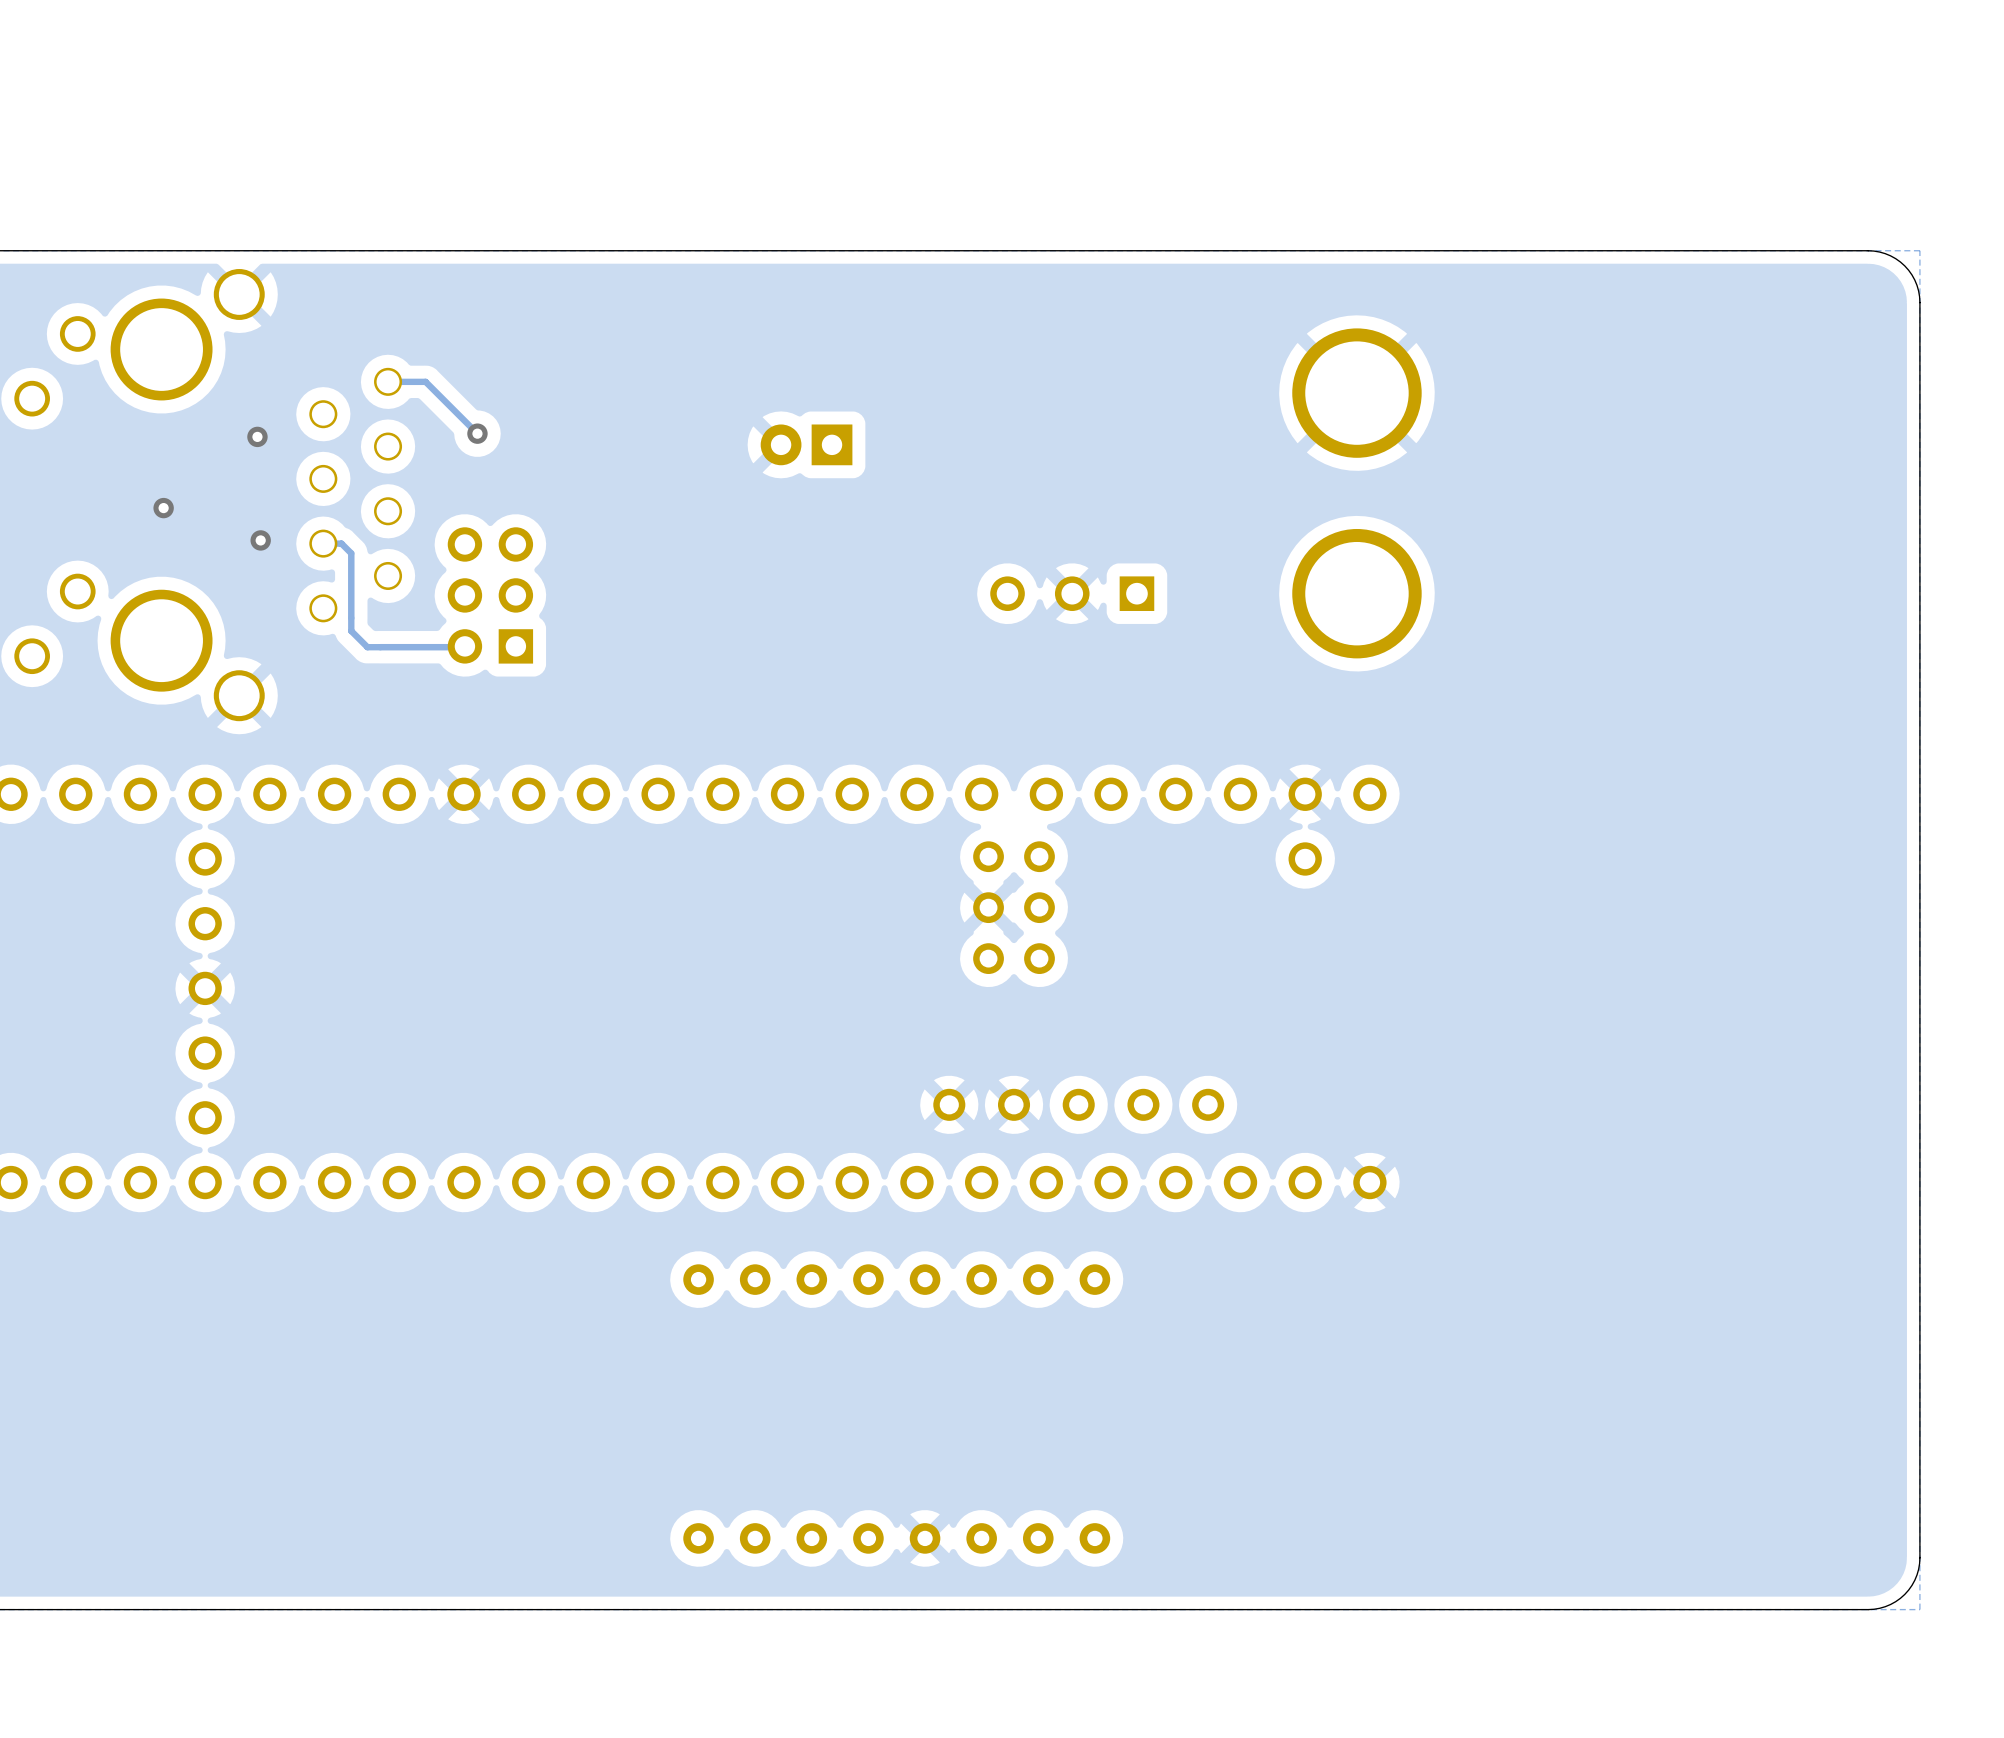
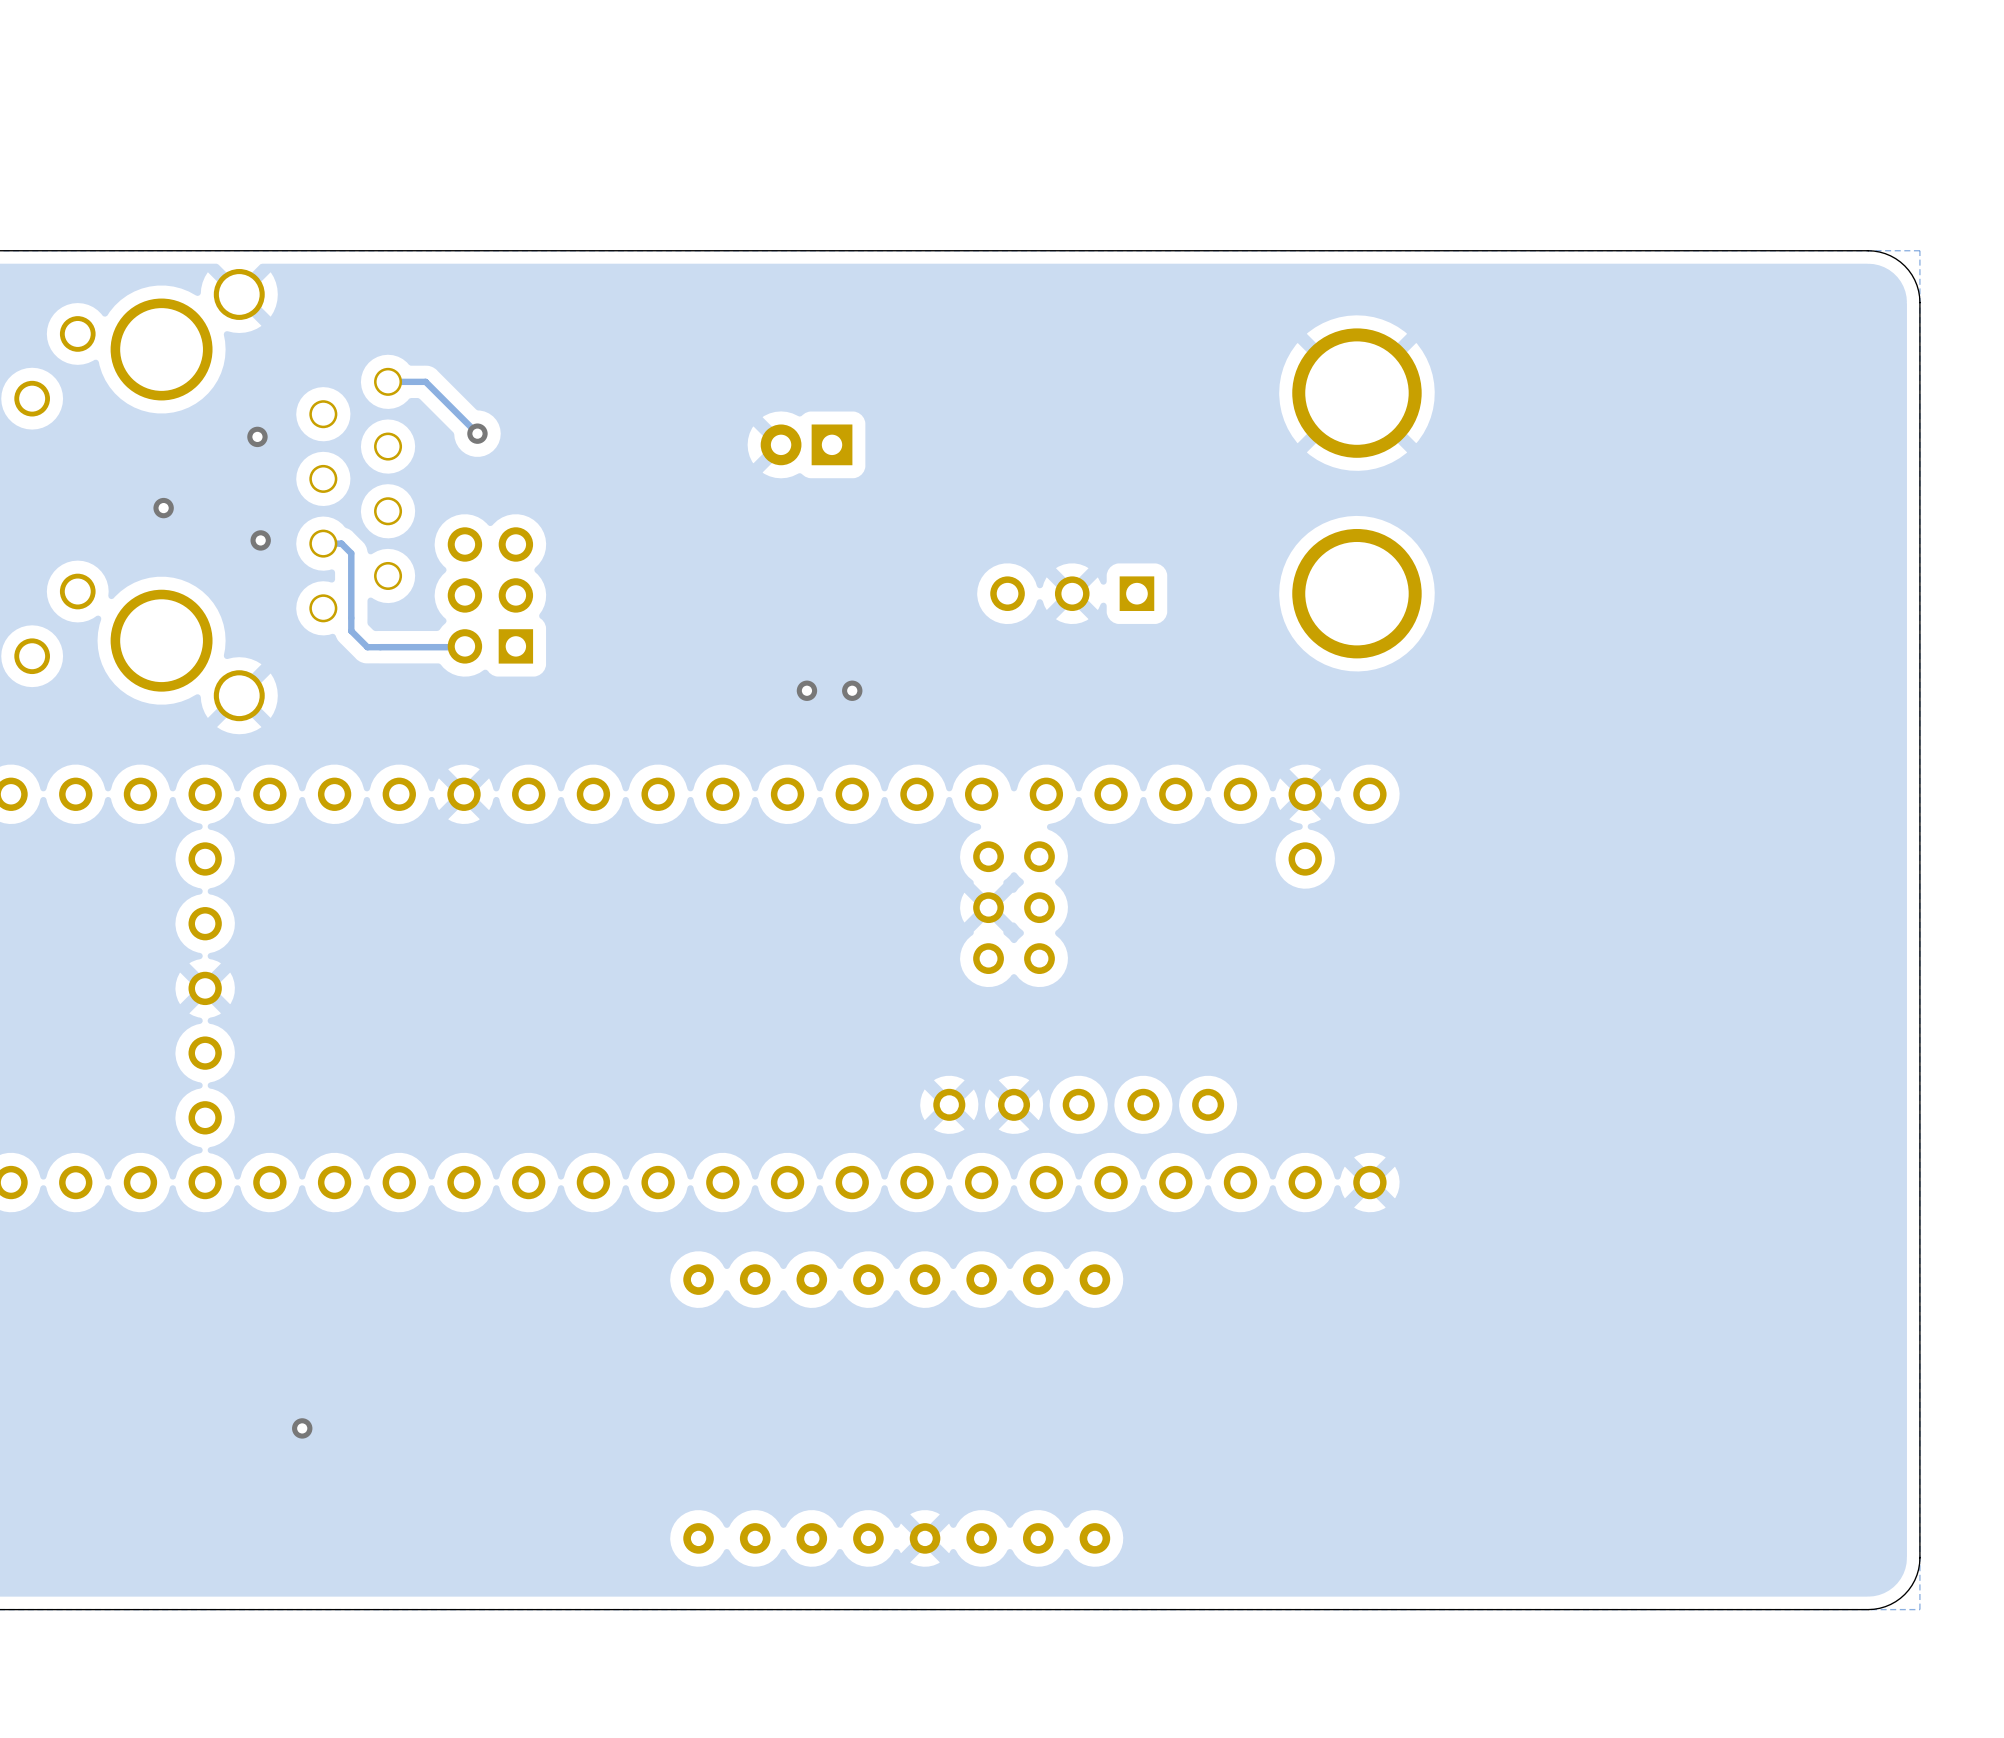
via: none -> (806, 690)
via: none -> (852, 690)
via: none -> (302, 1428)

